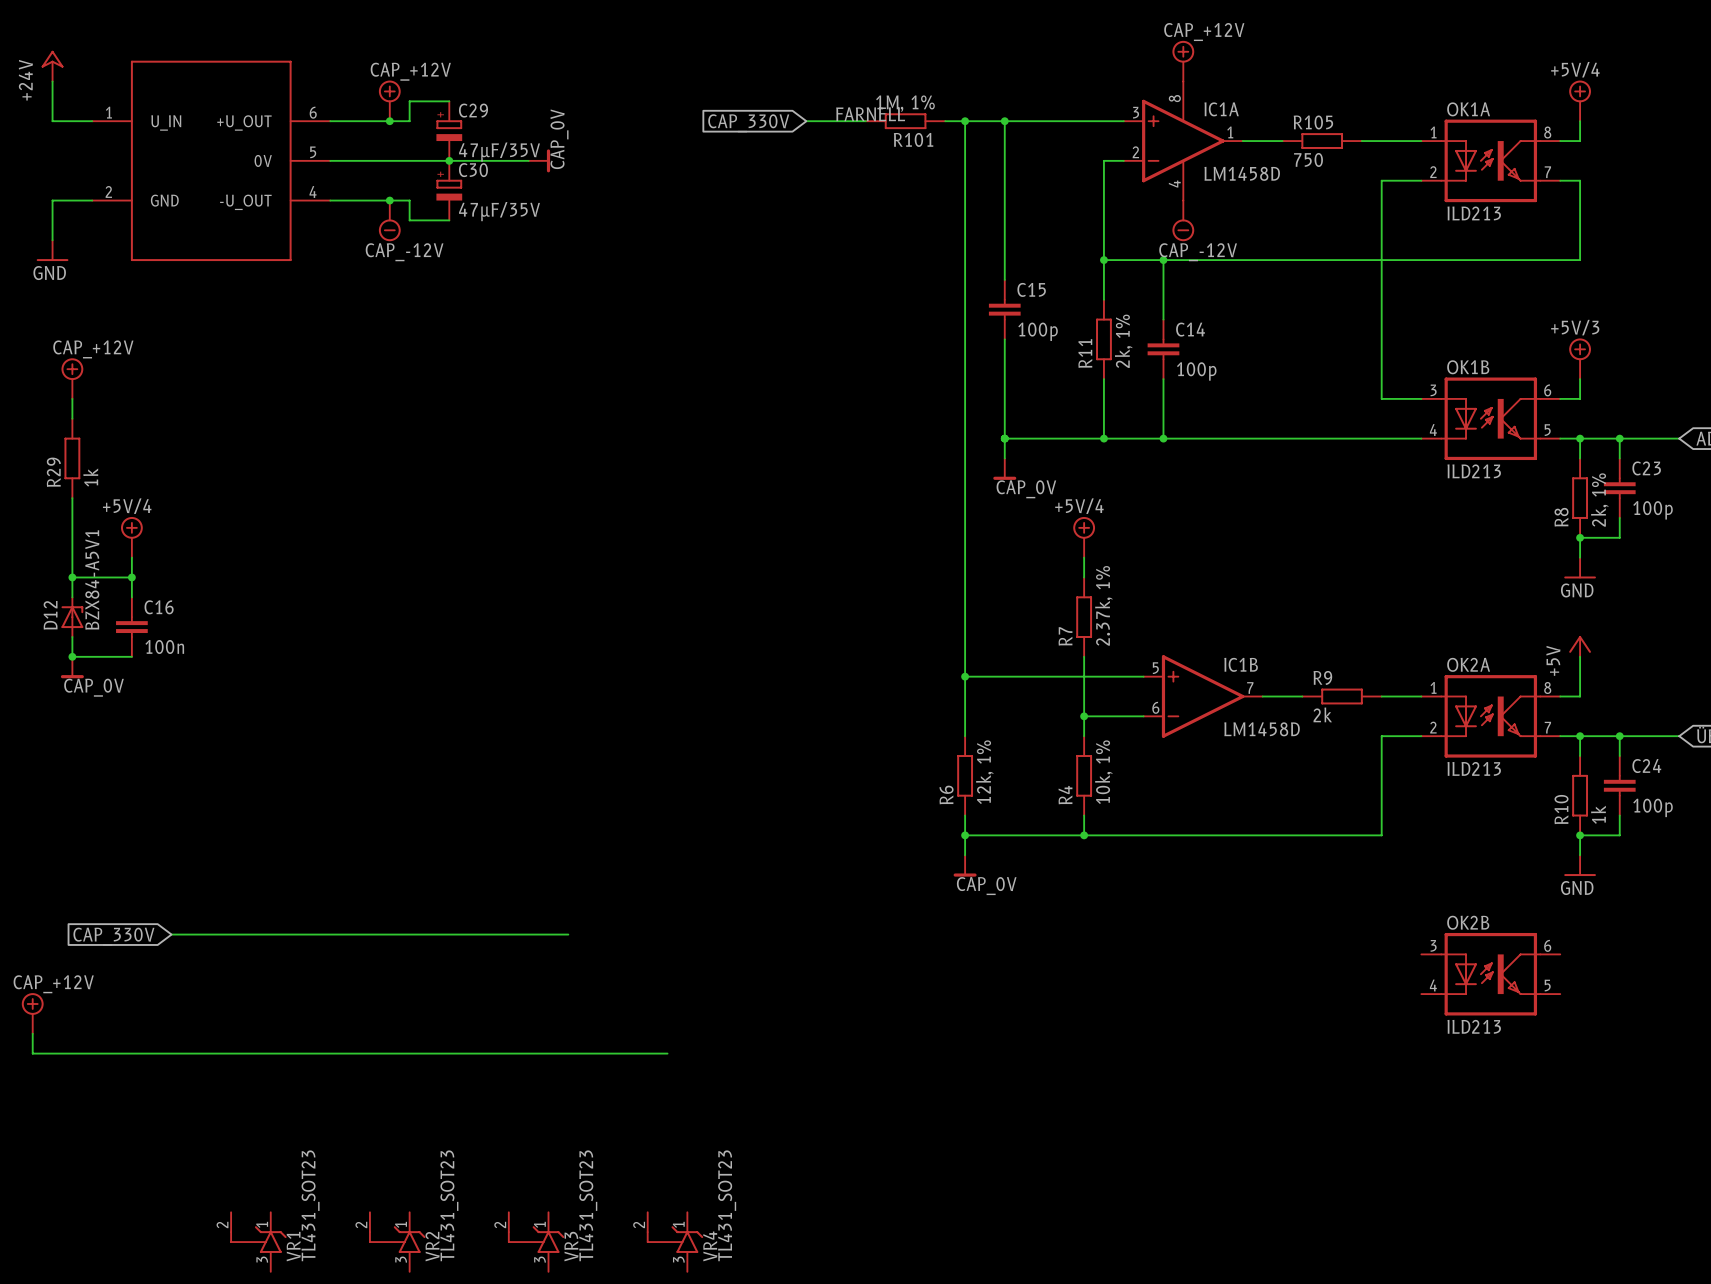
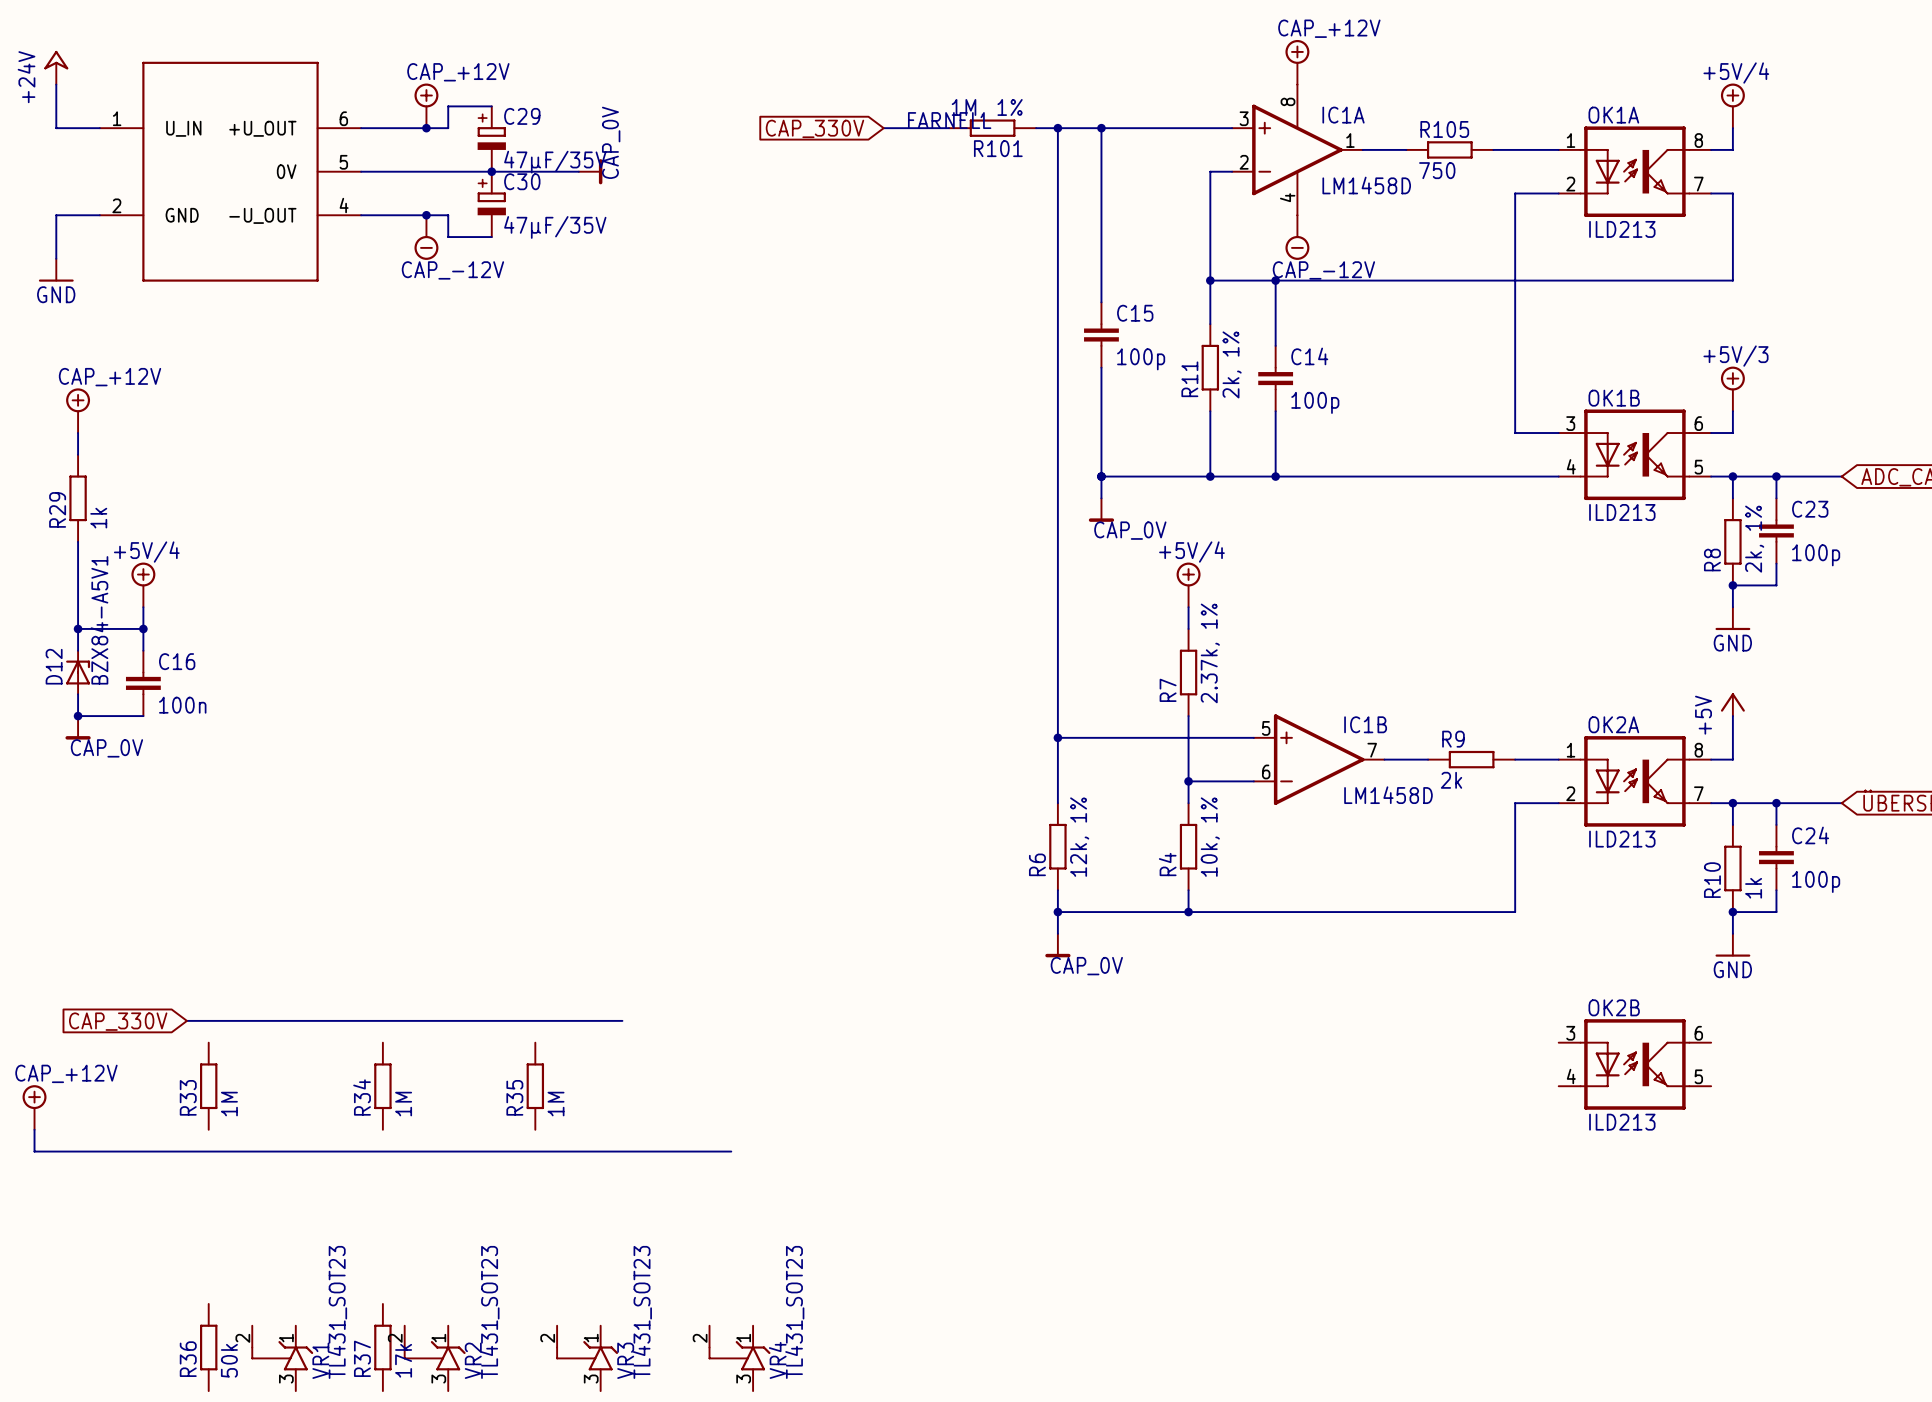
R33: none -> 1M (208, 1086)
R34: none -> 1M (382, 1086)
R35: none -> 1M (535, 1086)
R36: none -> 50k (208, 1347)
R37: none -> 17k (382, 1347)

